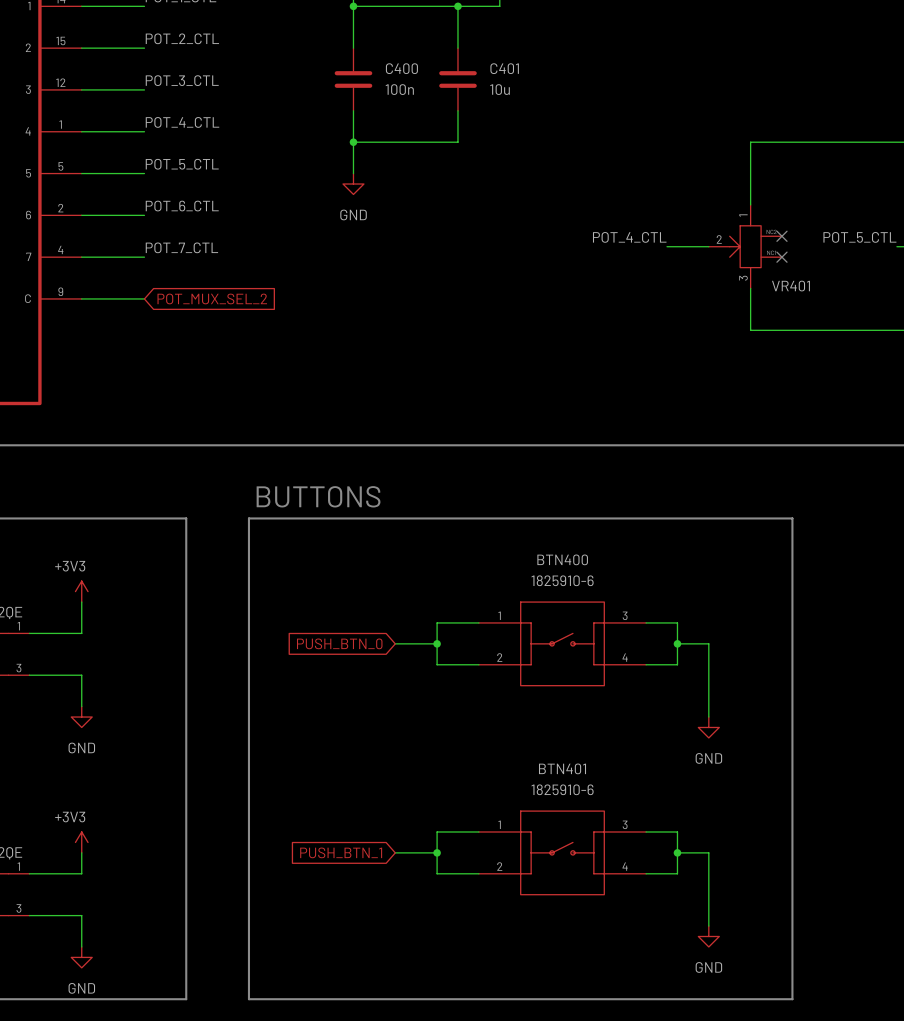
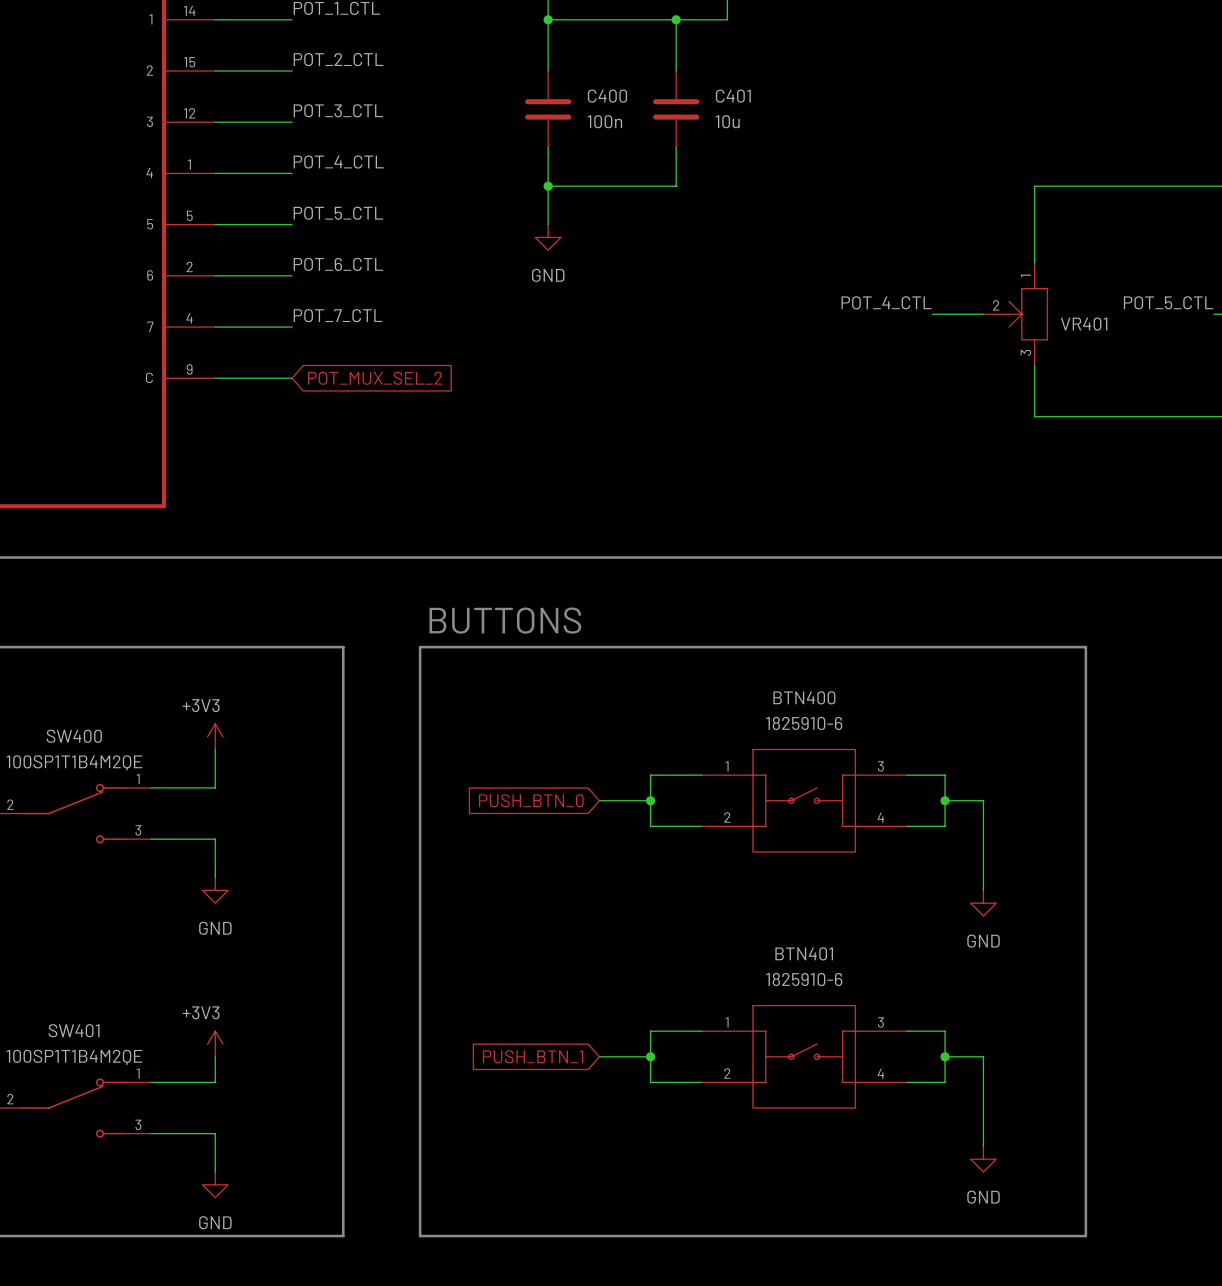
VR401 symbol: [708, 204, 782, 289] -> [983, 263, 1048, 366]
no-connect mark: (781, 236) -> none
no-connect mark: (781, 257) -> none
VR401 name position: VR401 (791, 286) -> VR401 (1084, 324)

